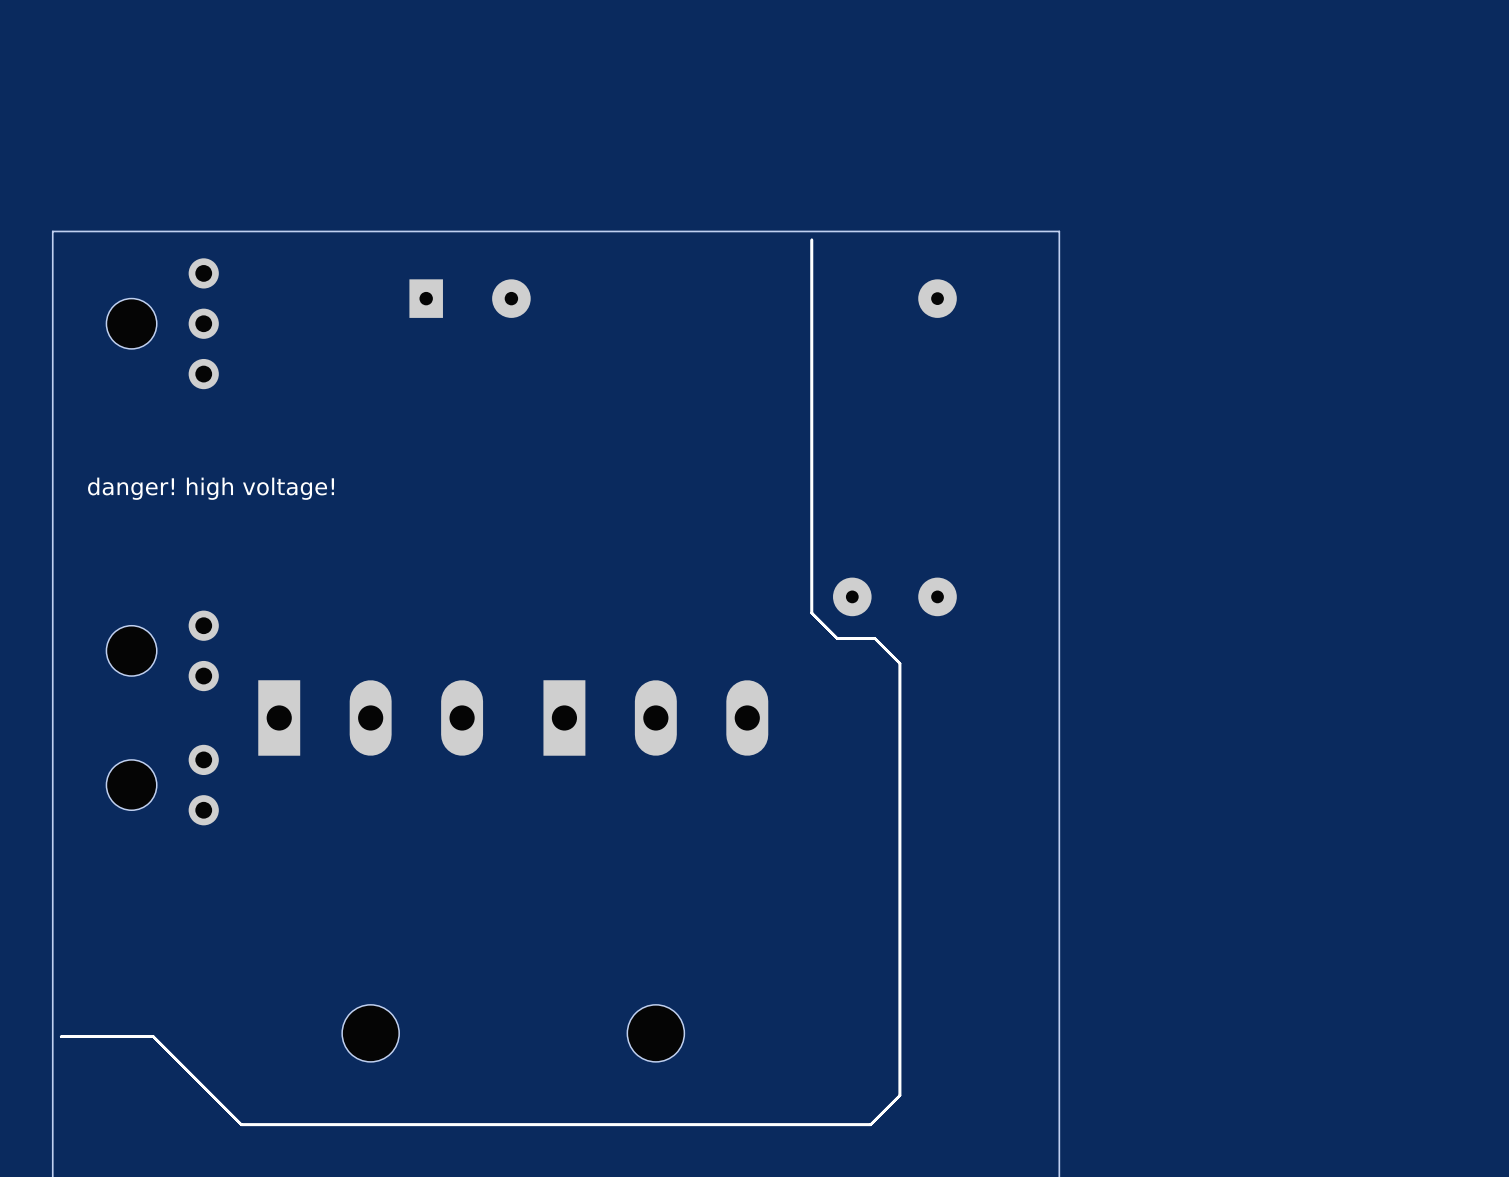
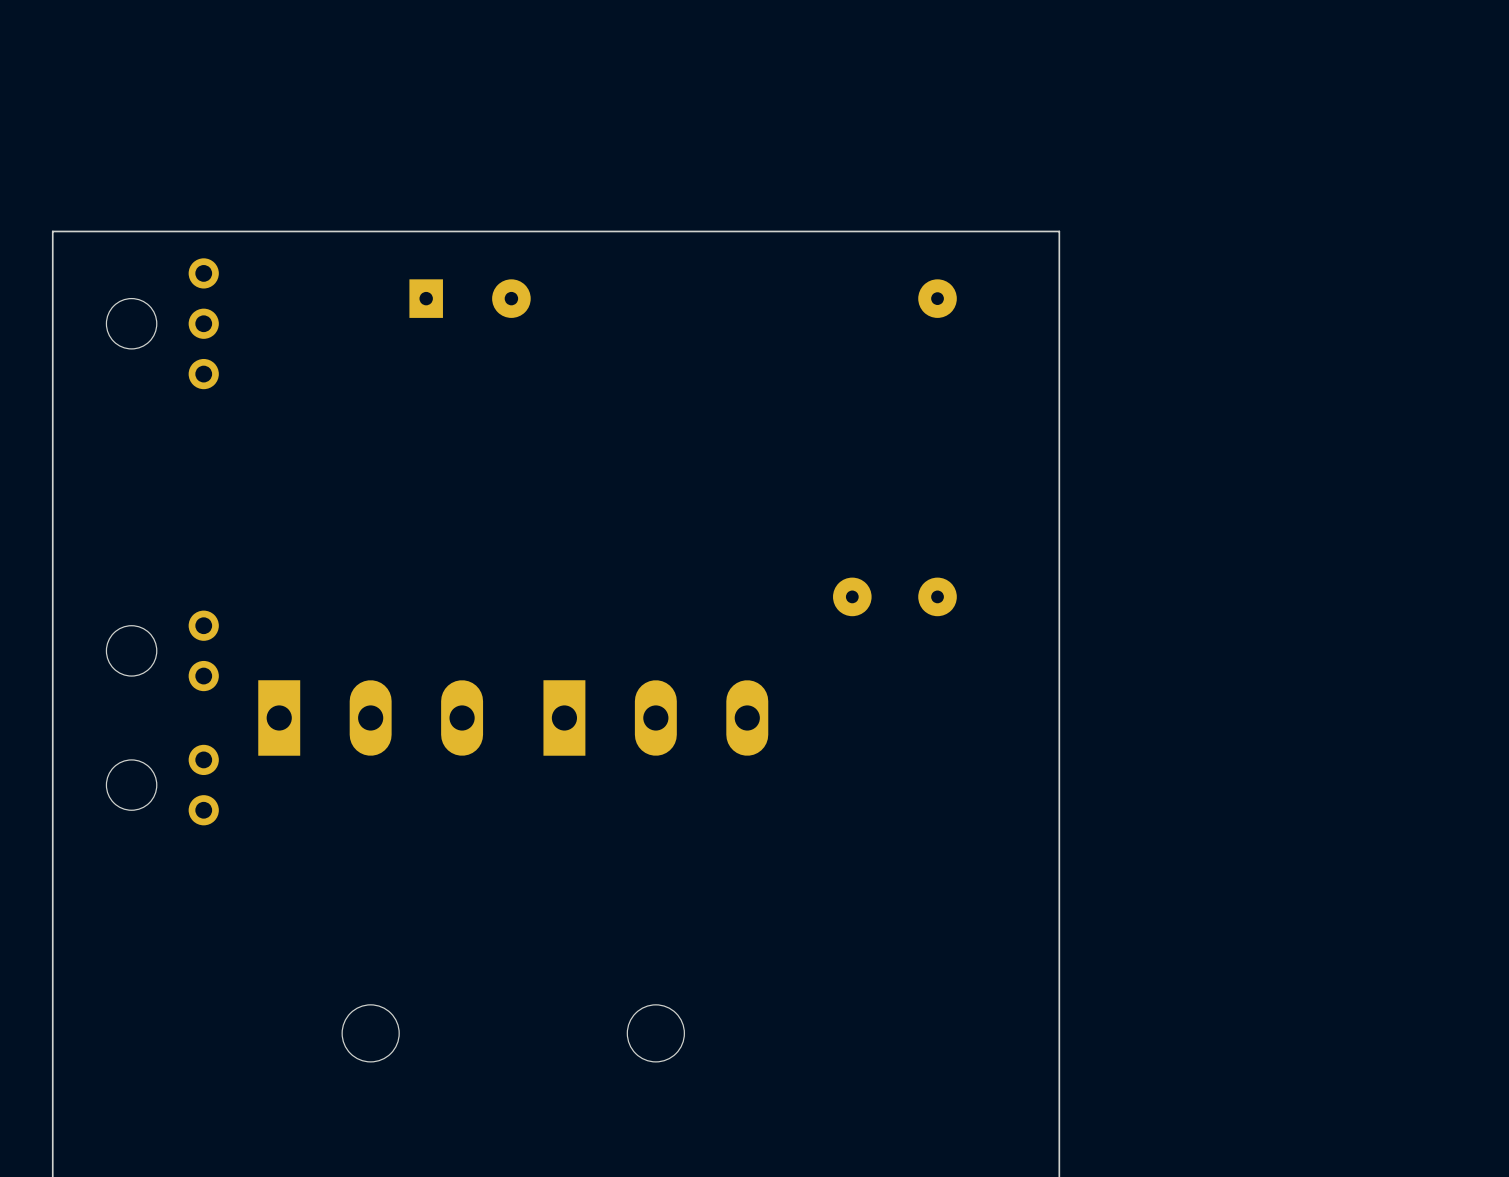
line: (811, 239) (811, 613) (837, 638) (874, 638) (899, 663) (899, 1095) (870, 1124) (241, 1124) (153, 1036) (61, 1036) -> none
text: danger! high voltage! (211, 488) -> none

